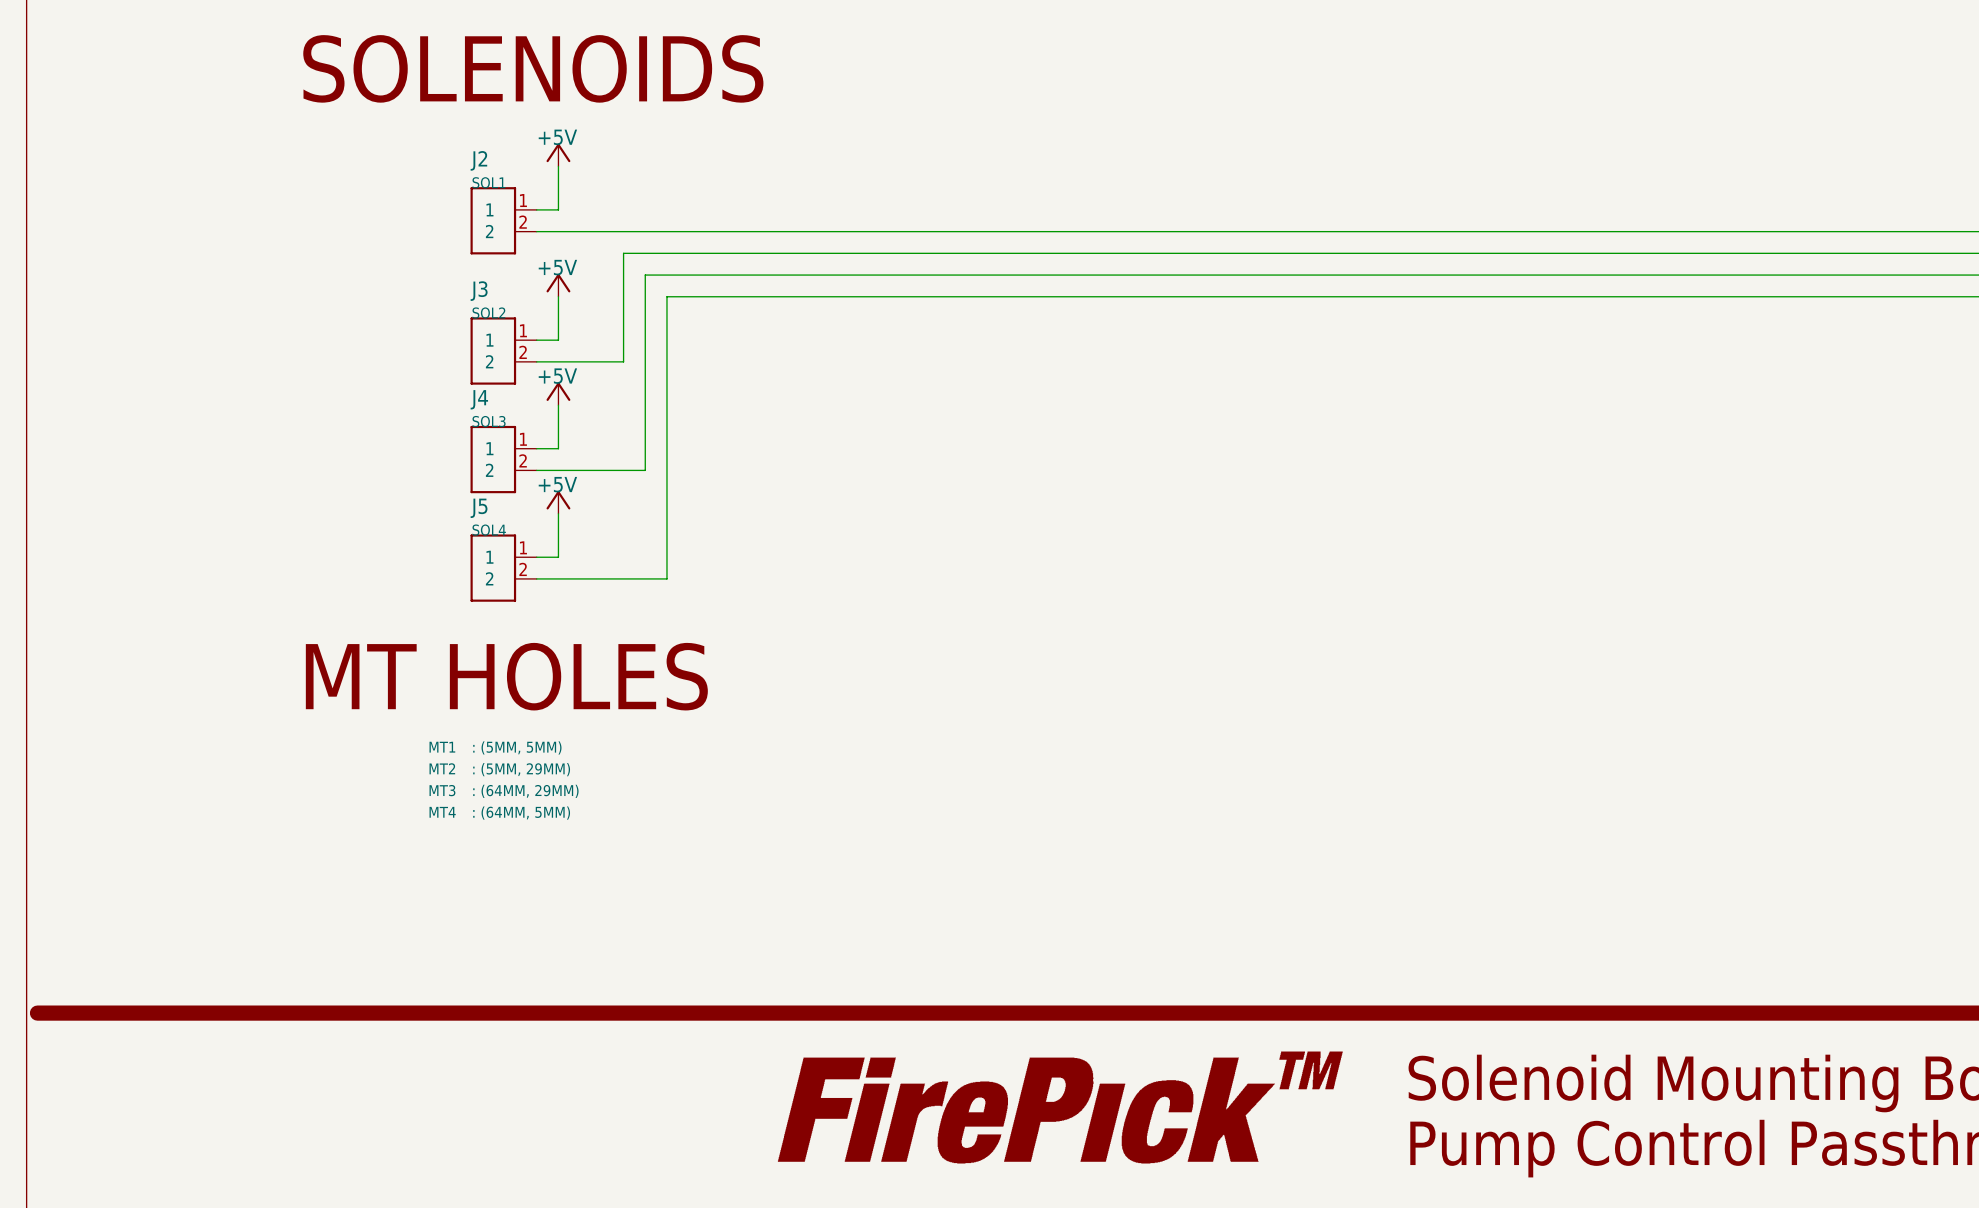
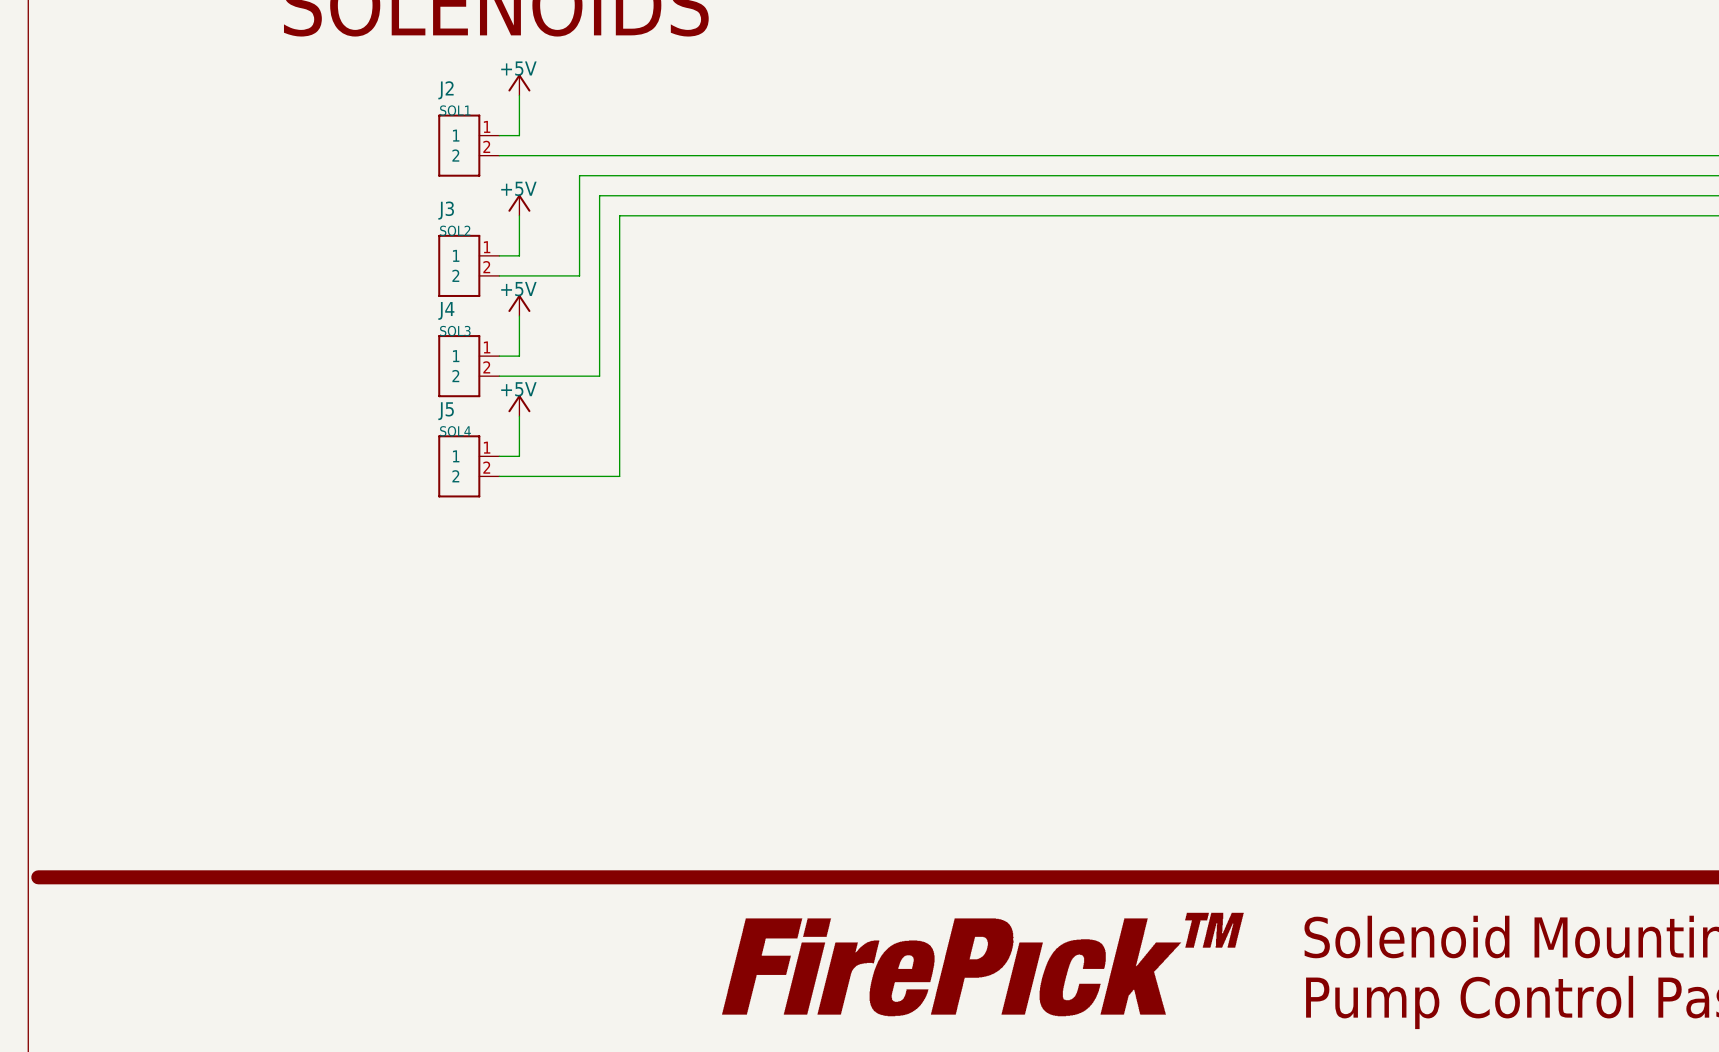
text: MT HOLES (506, 676) -> none
MT1: : (5MM, 5MM) (495, 747) -> none
MT2: : (5MM, 29MM) (499, 769) -> none
MT3: : (64MM, 29MM) (504, 791) -> none
MT4: : (64MM, 5MM) (499, 813) -> none

